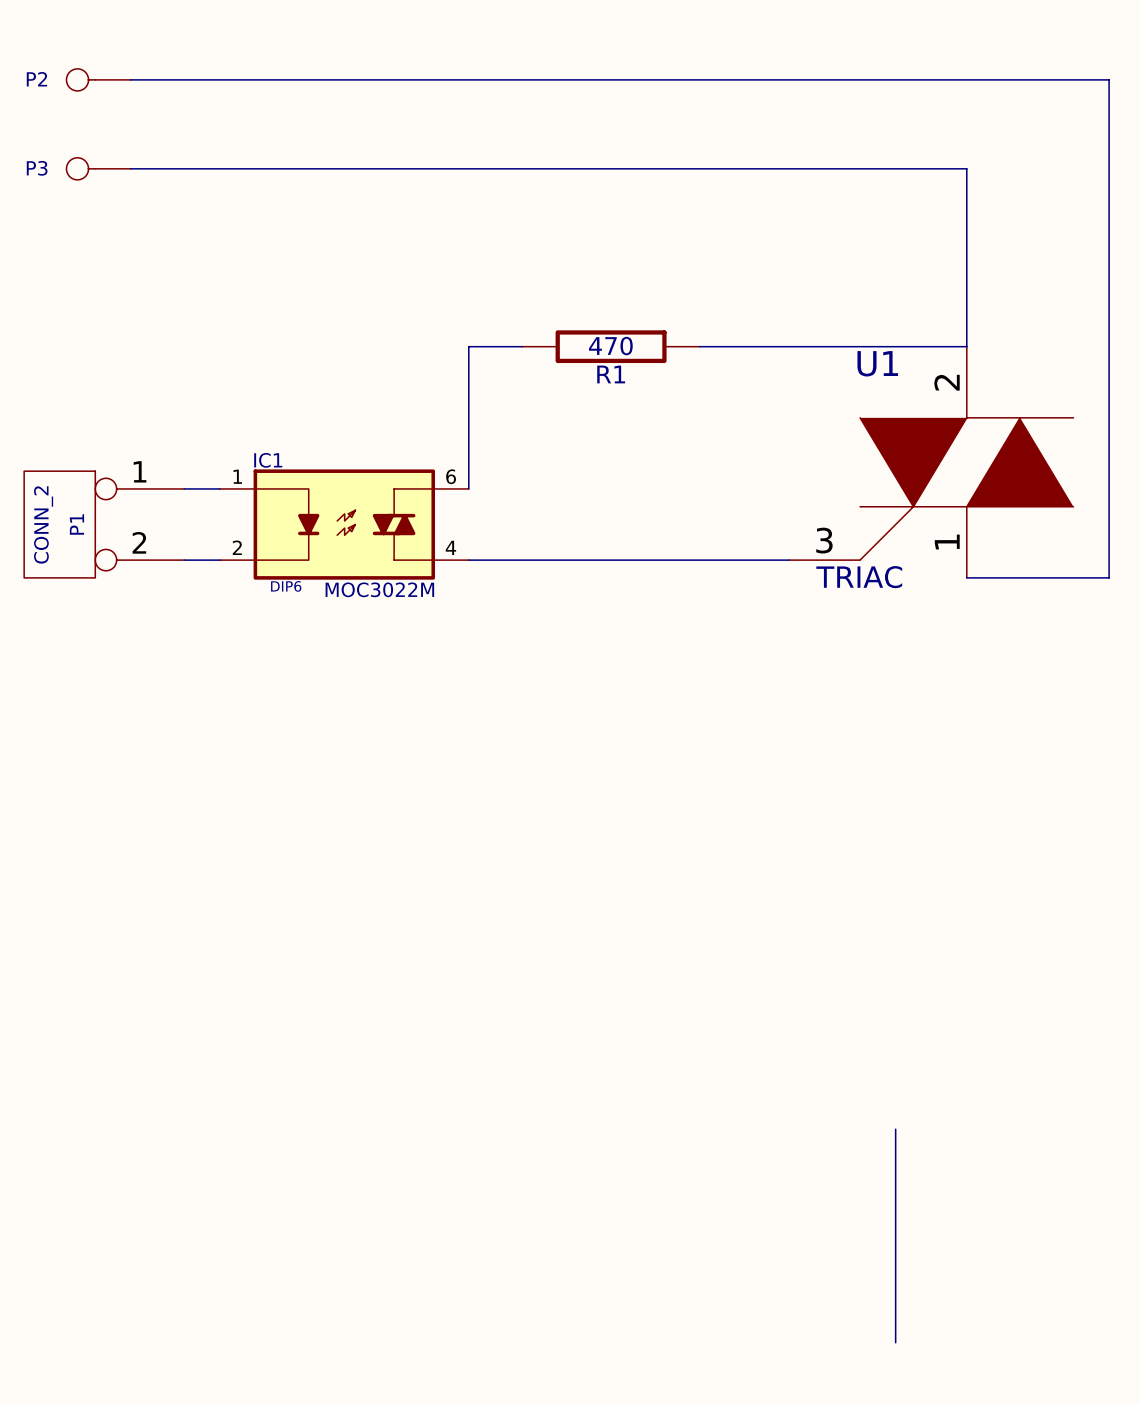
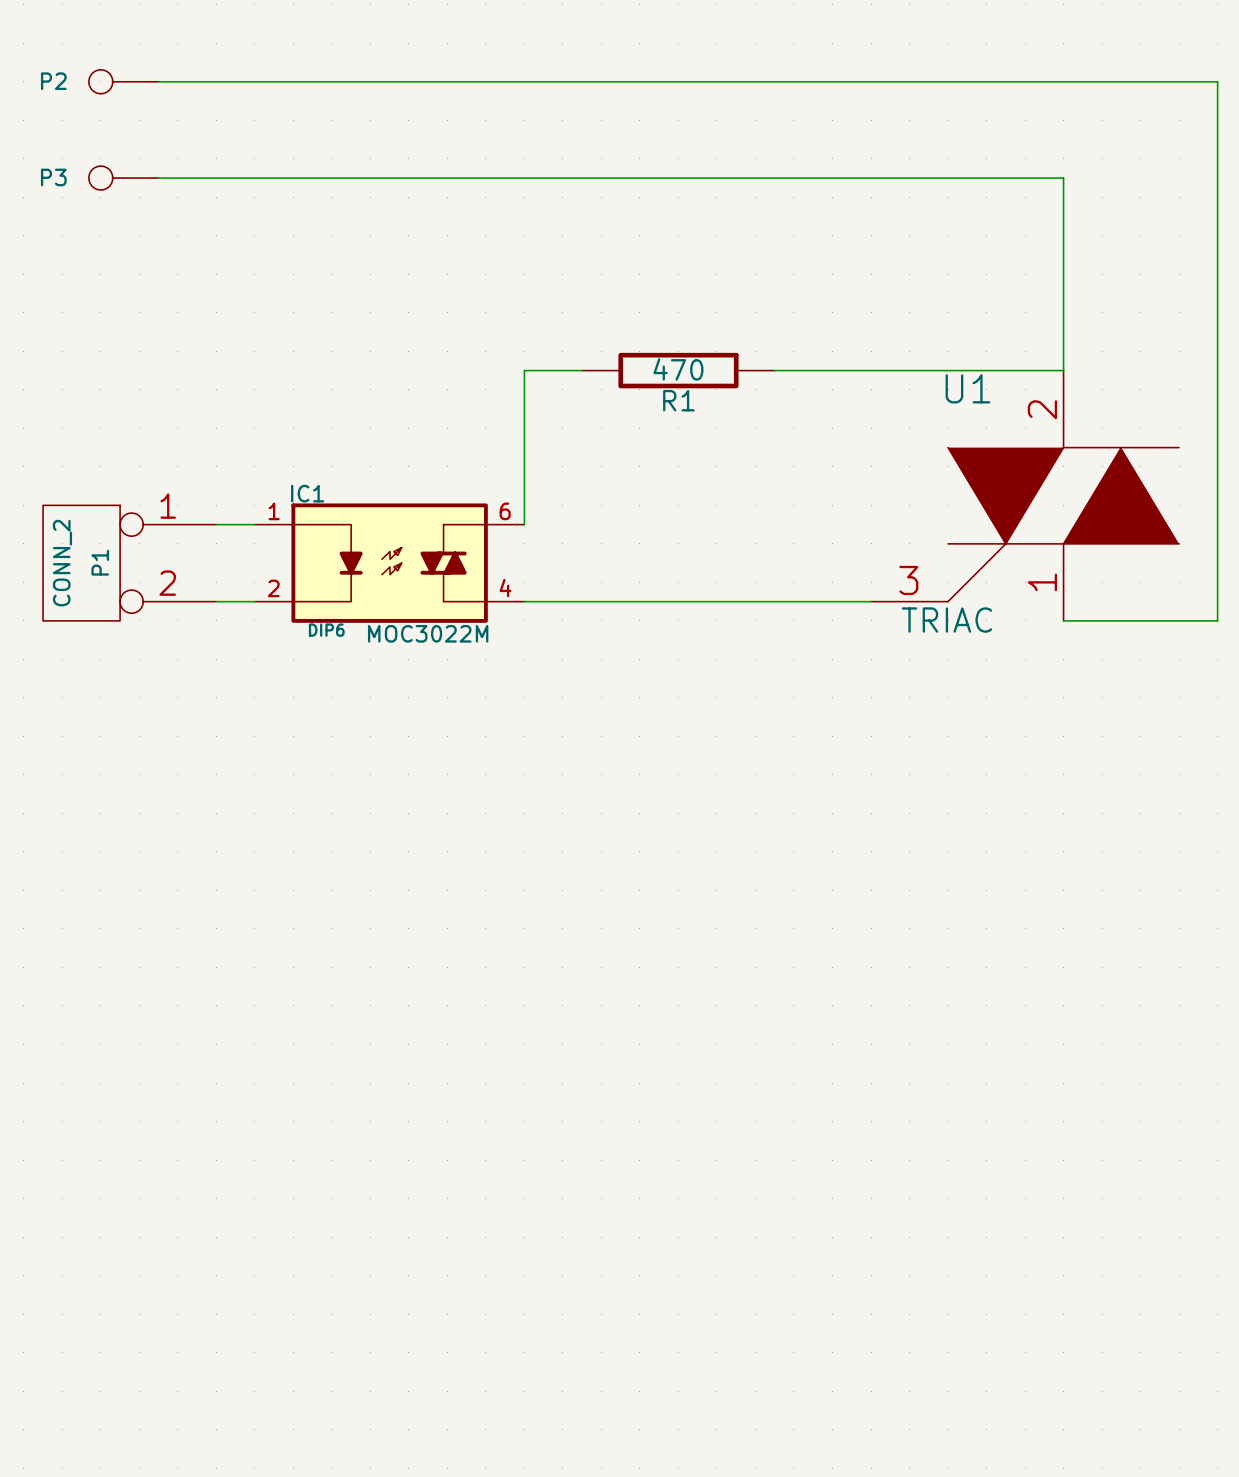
wire: (895, 1129) (895, 1342) -> none

